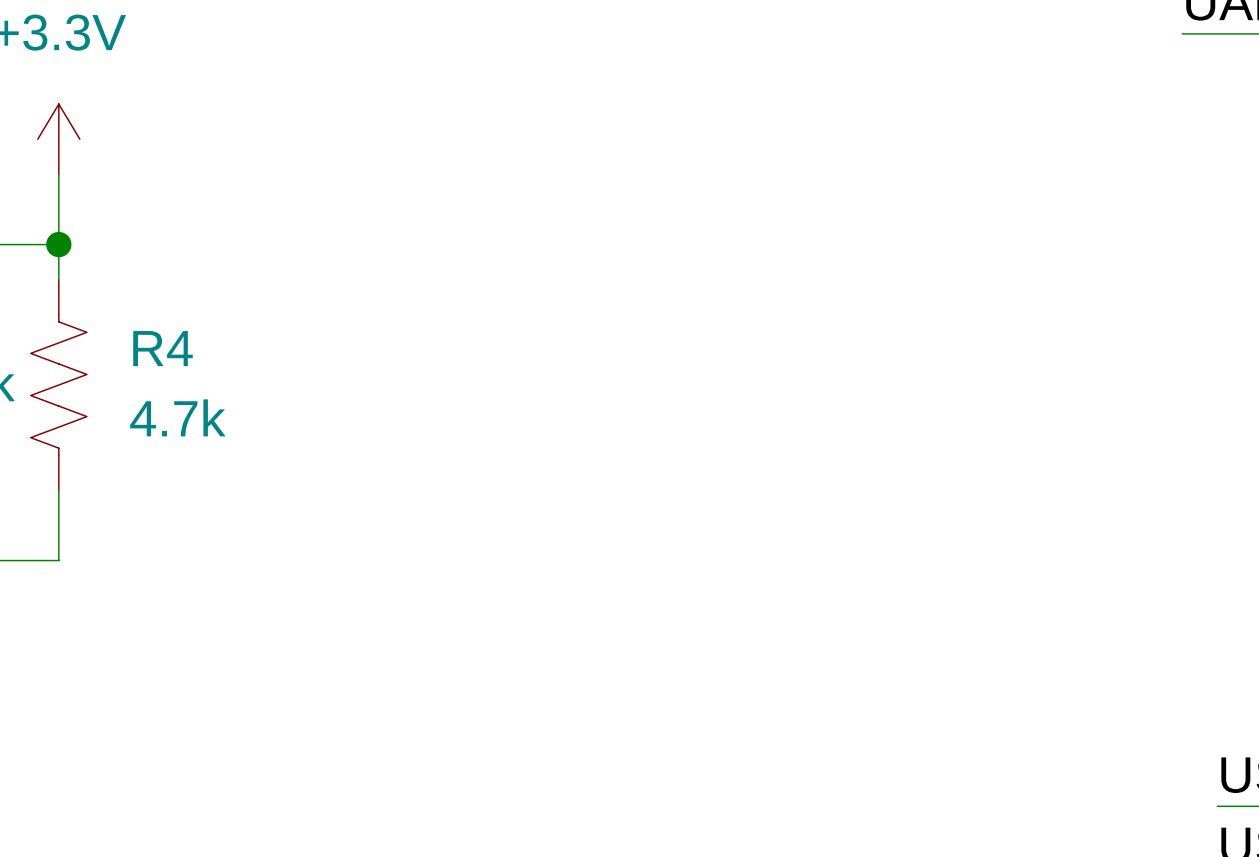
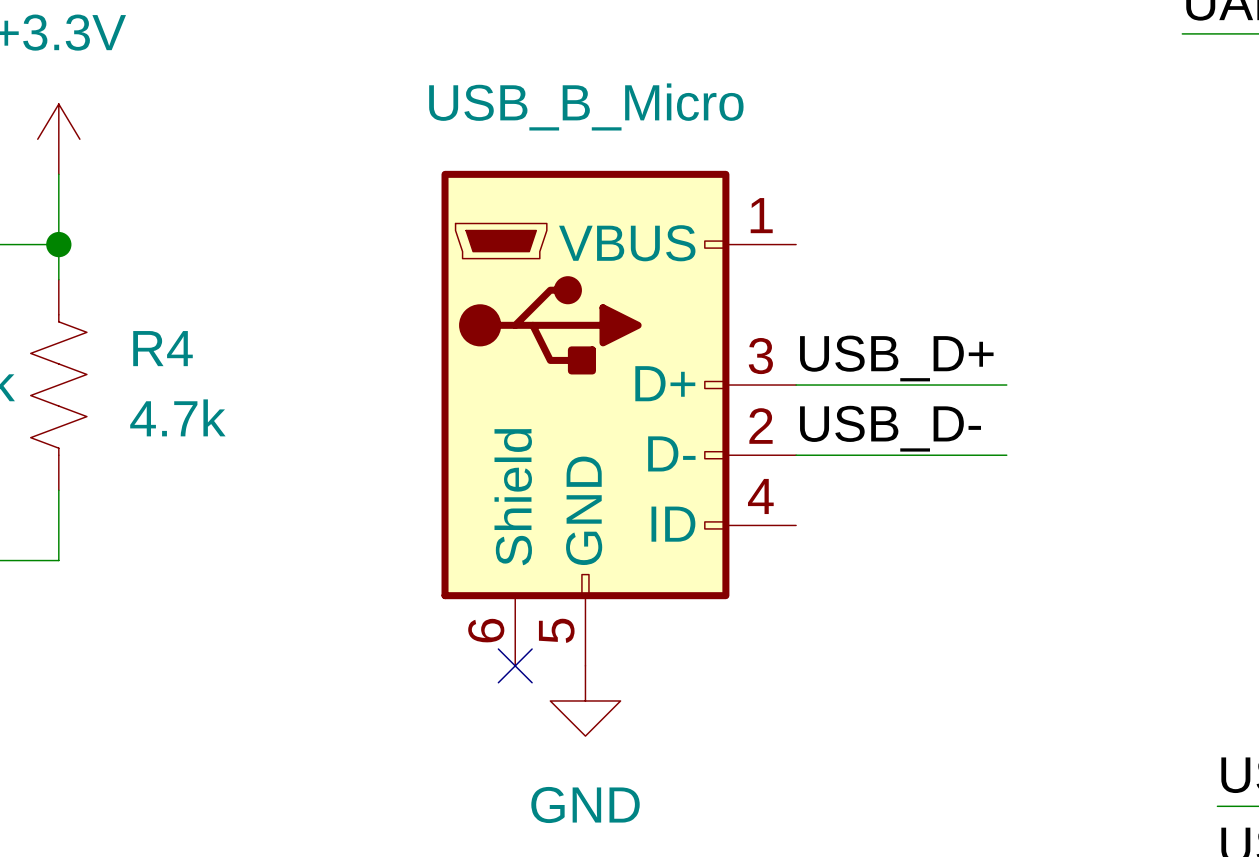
label: none -> USB_D+ (896, 358)
wire: none -> (796, 385) (1006, 385)
part: none -> USB_B_Micro (618, 418)
label: none -> USB_D- (890, 428)
wire: none -> (796, 455) (1006, 455)
no-connect mark: none -> (515, 665)
power symbol: none -> GND (585, 700)

